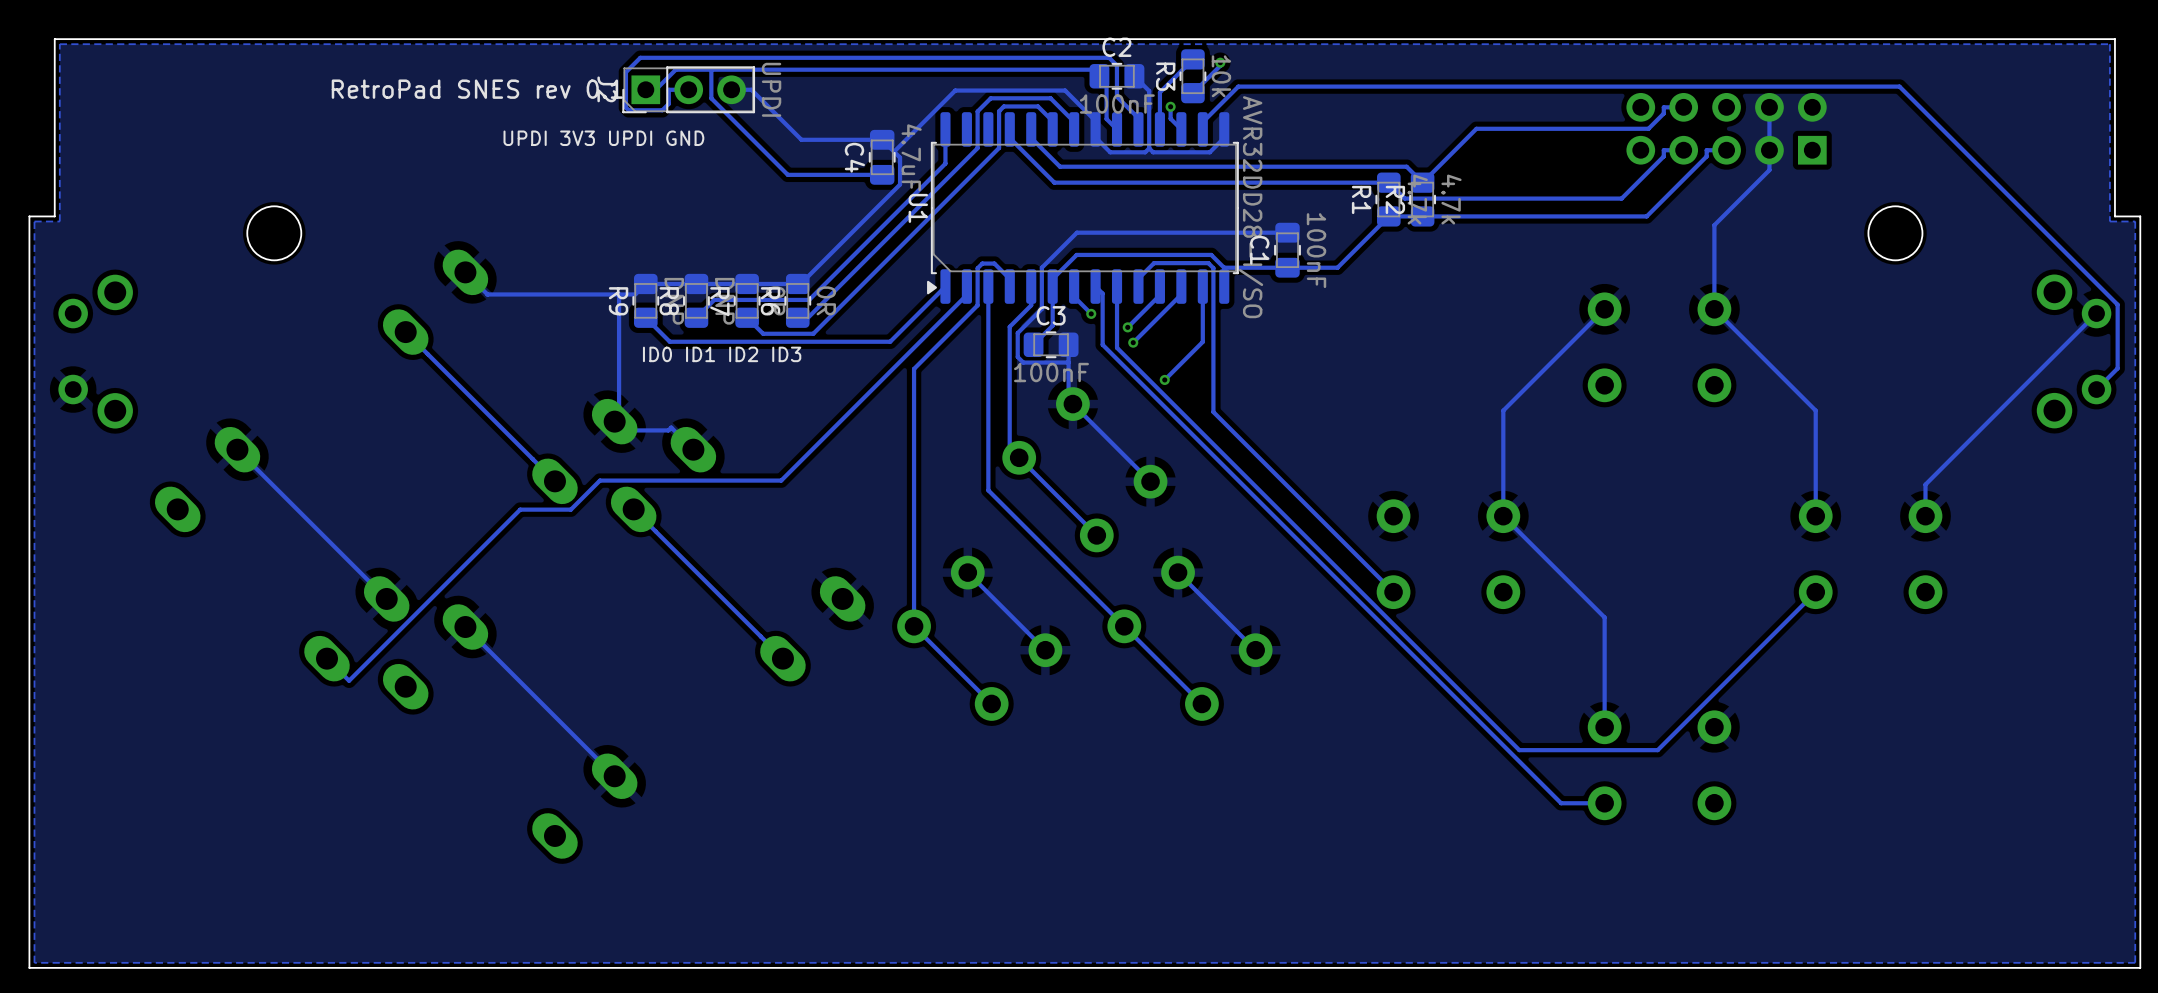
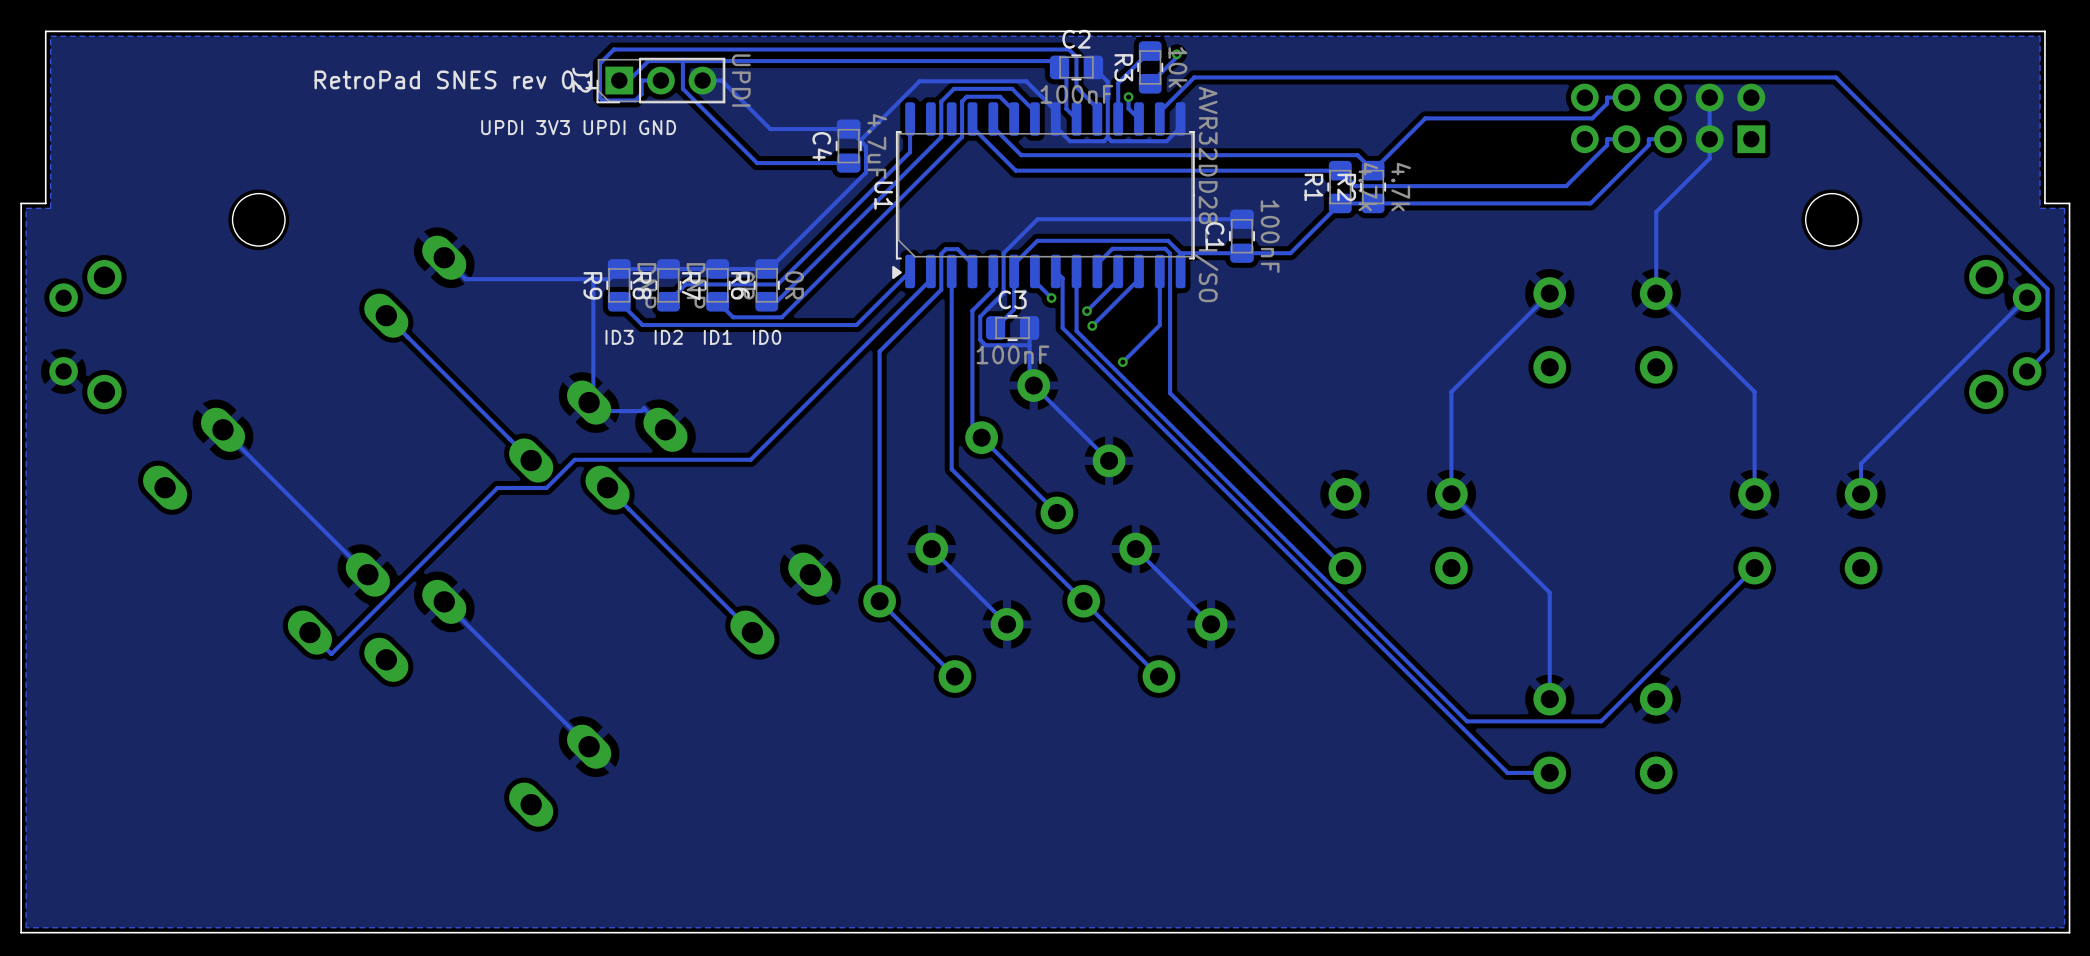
text: none -> ID3 (619, 337)
text: none -> ID2 (668, 337)
text: ID0 ID1 ID2 ID3 (722, 354) -> none
text: none -> ID1 (717, 337)
text: none -> ID0 (767, 337)

